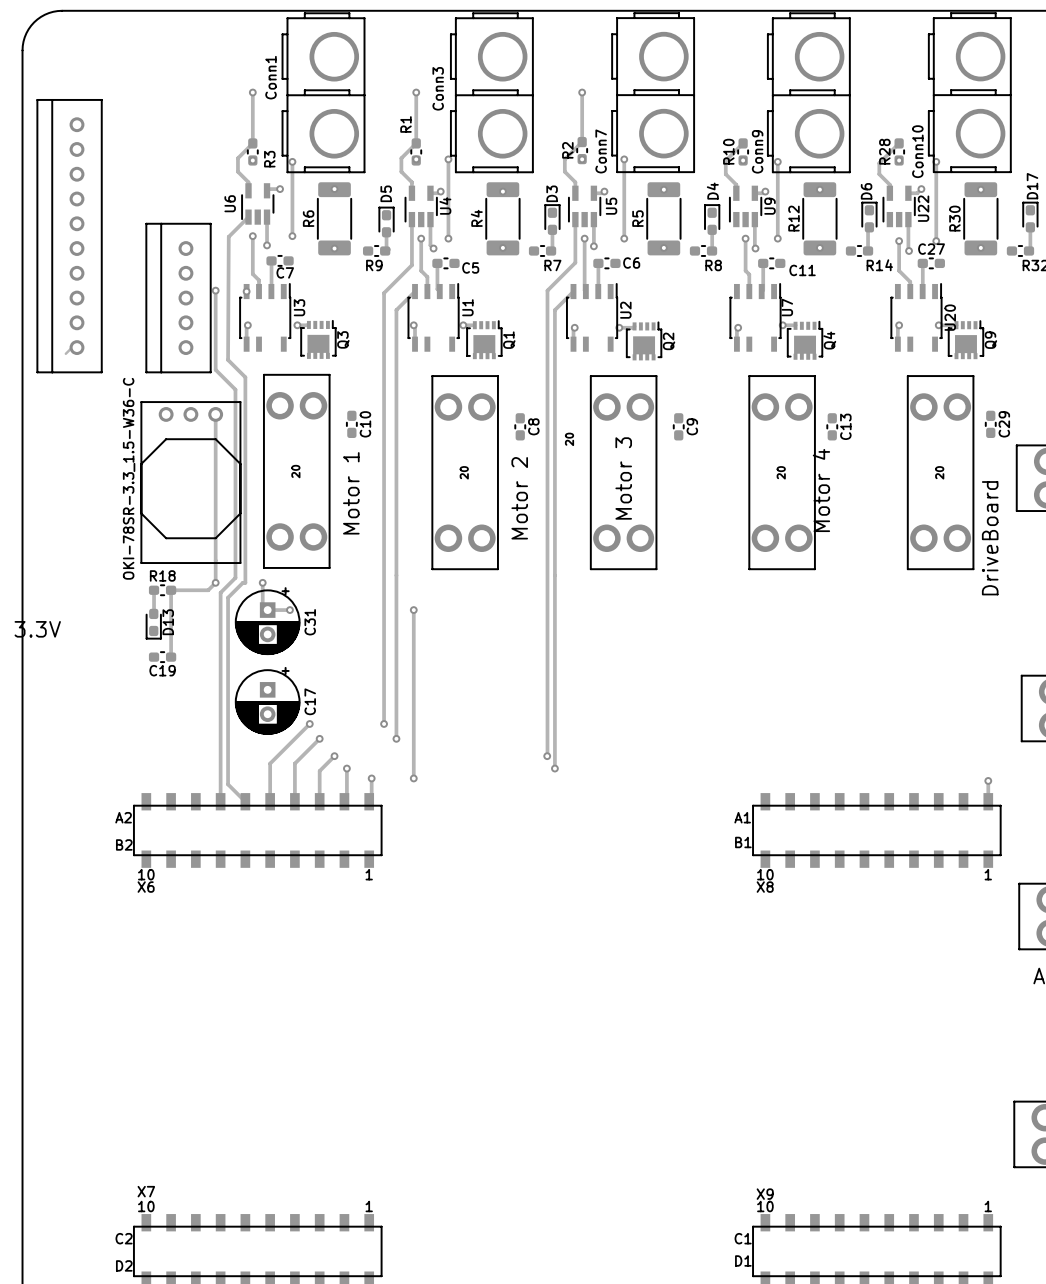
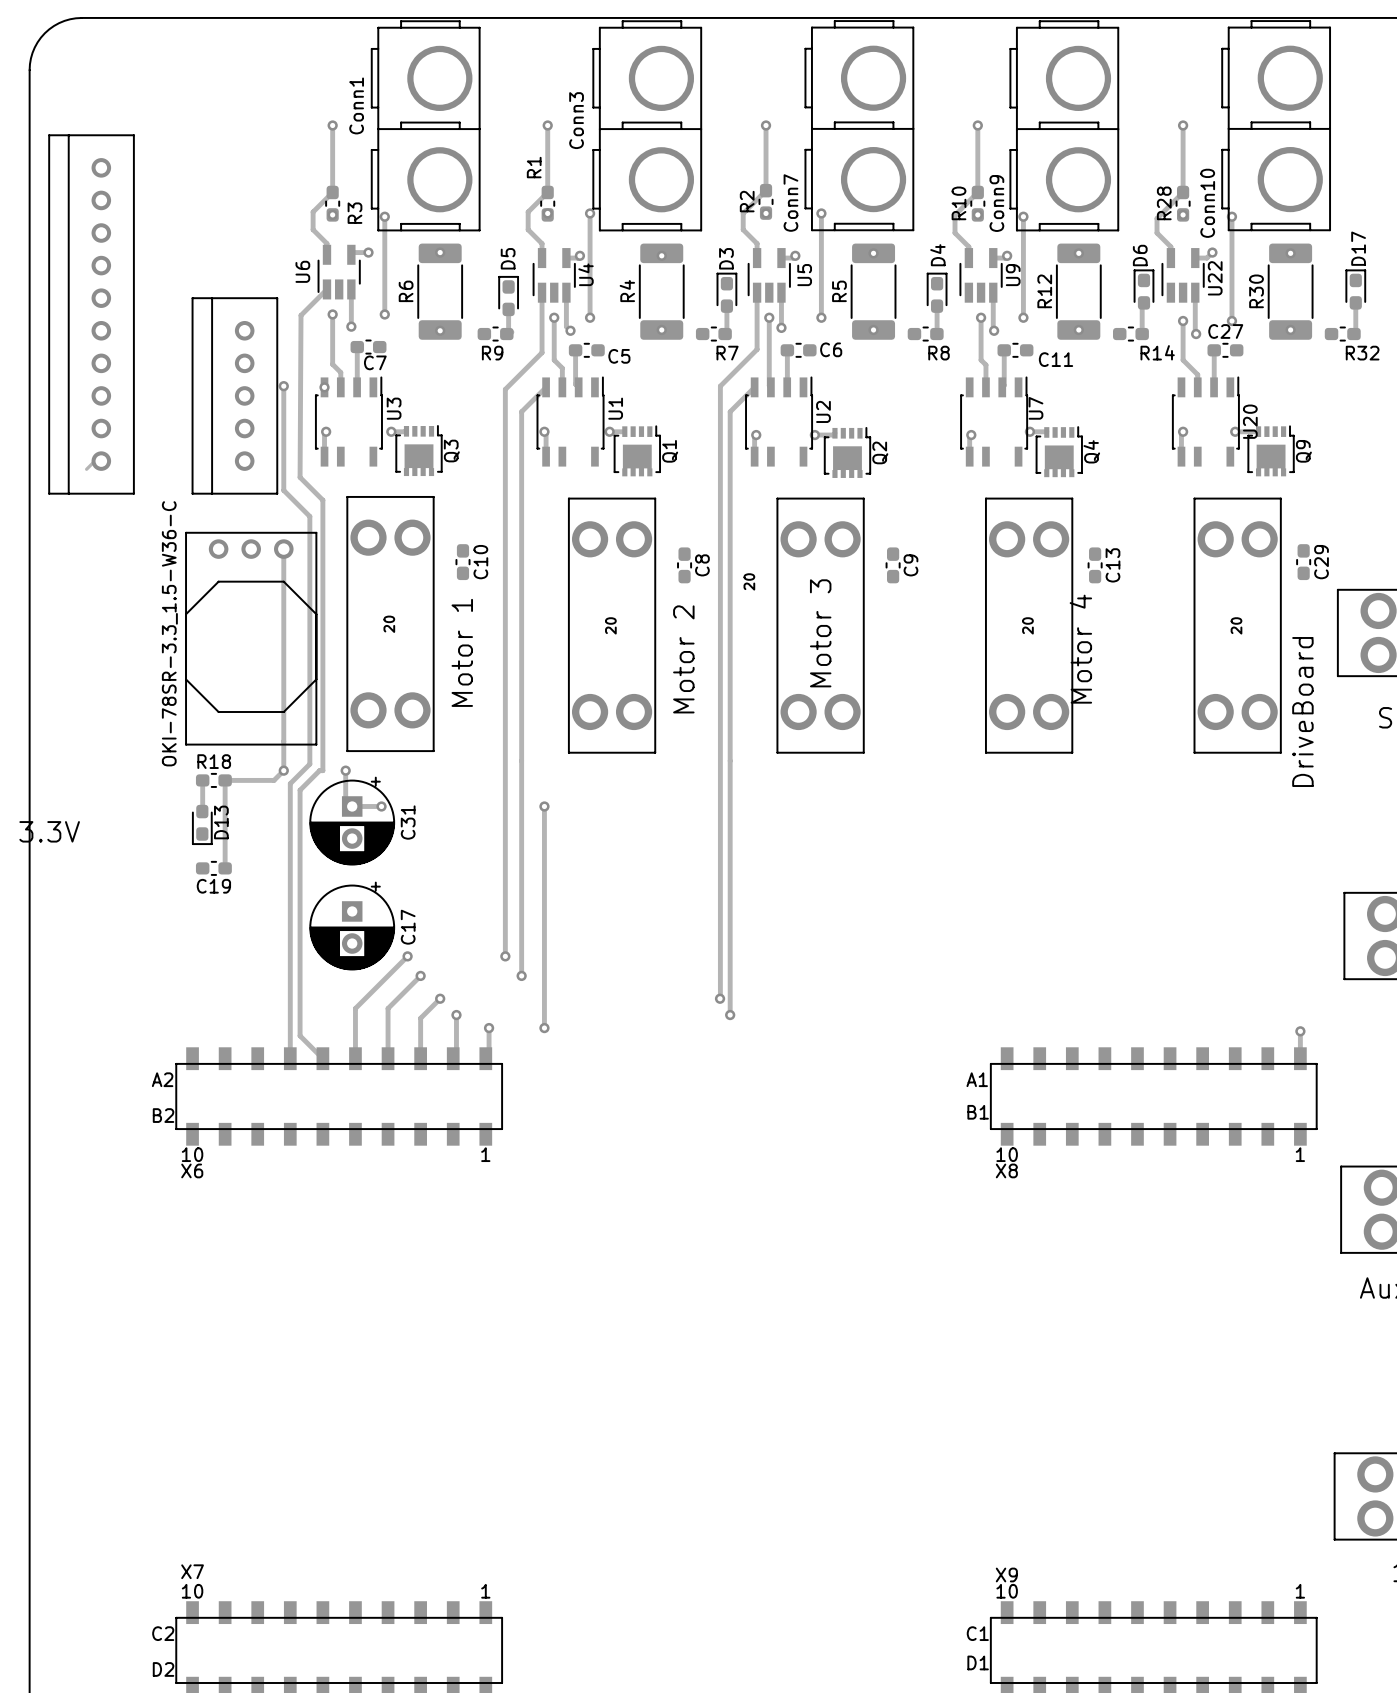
track: none -> (977, 125) (977, 192)
via: none -> (977, 125)
track: none -> (1183, 125) (1183, 192)
via: none -> (1183, 125)

